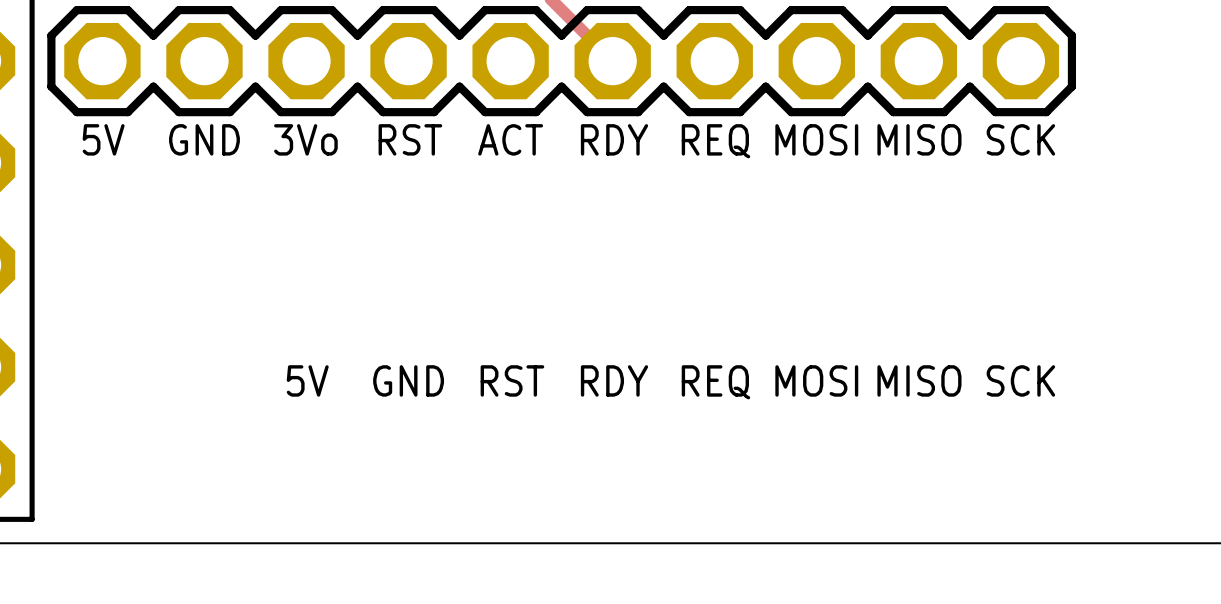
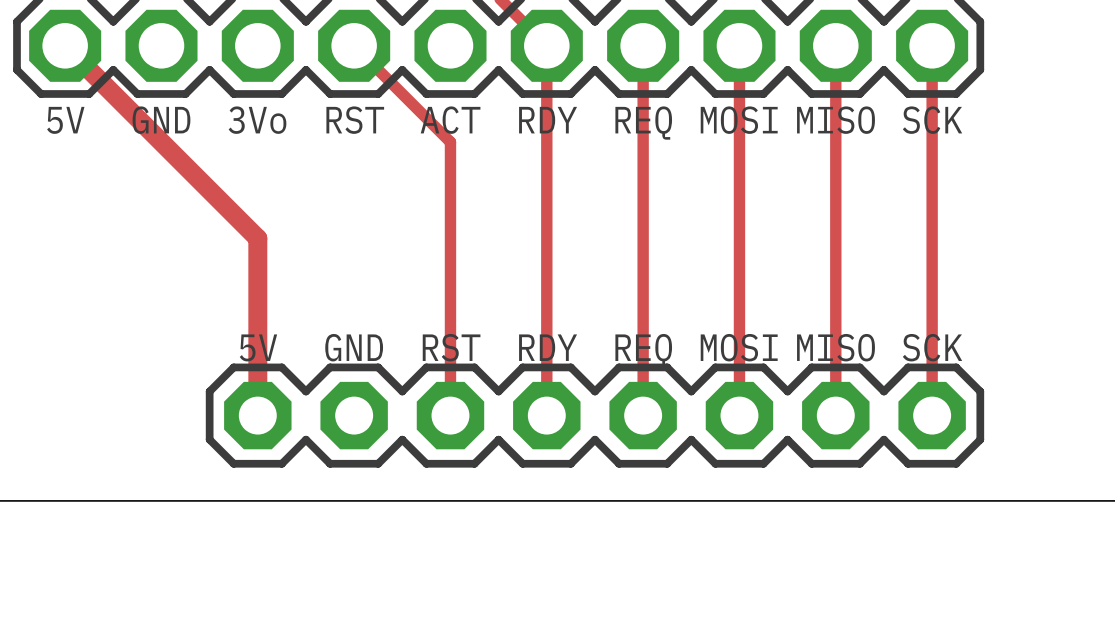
track: none -> (65, 45) (257, 238) (257, 415)
track: none -> (354, 45) (450, 142) (450, 415)
track: none -> (546, 45) (546, 415)
track: none -> (643, 45) (643, 415)
track: none -> (739, 45) (739, 415)
track: none -> (835, 45) (835, 415)
track: none -> (932, 45) (932, 415)
part: none -> (594, 415)

